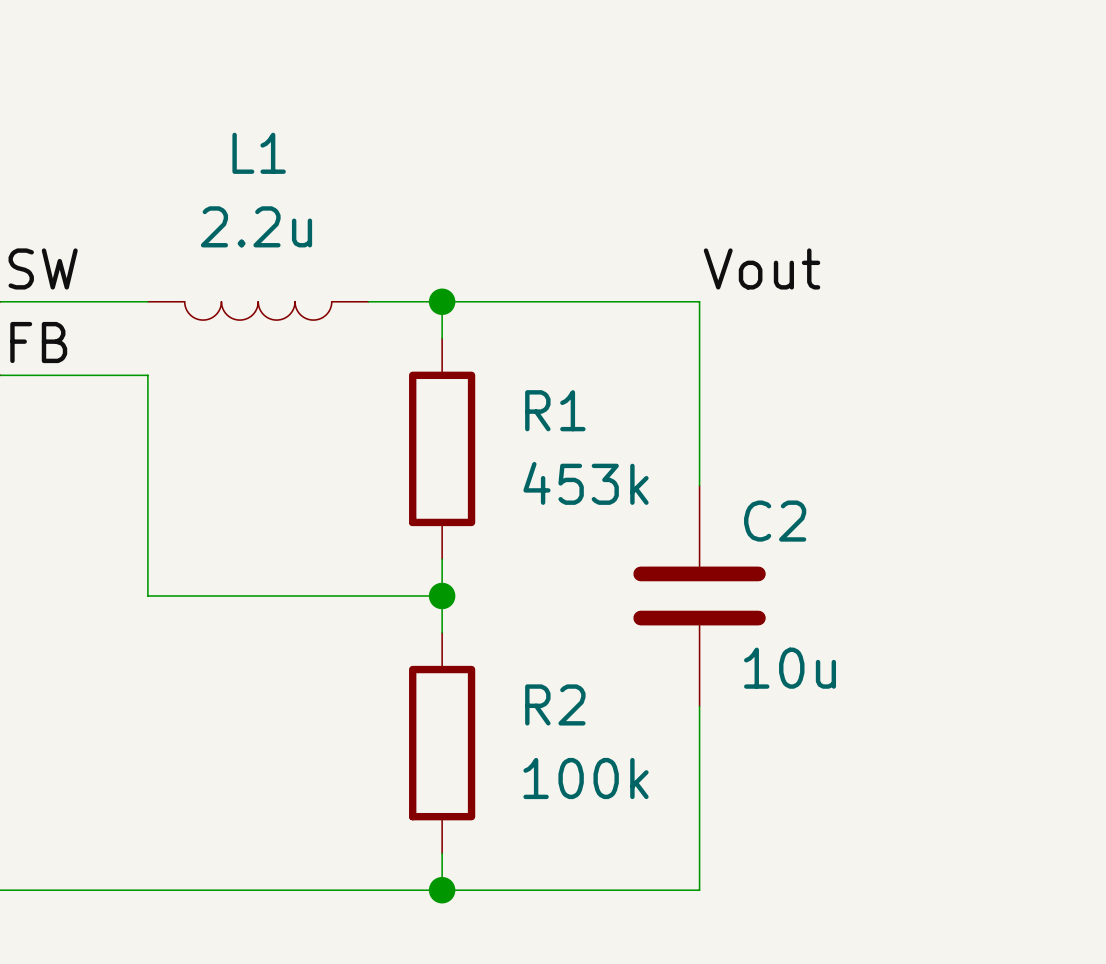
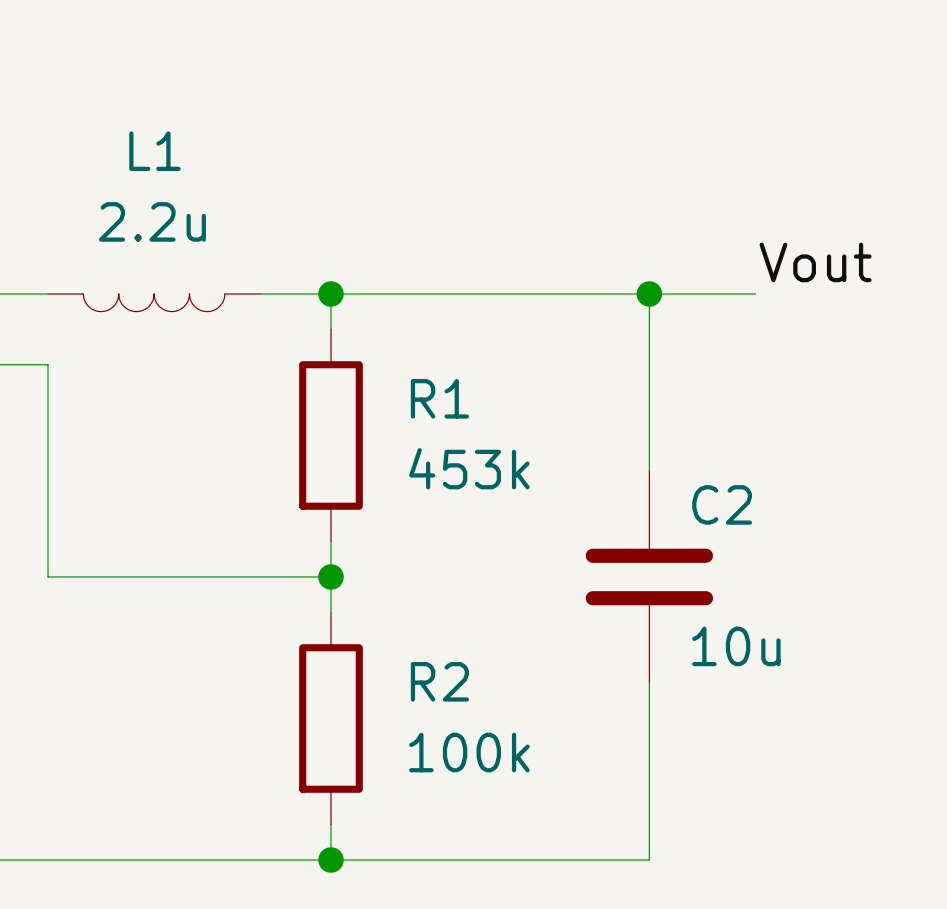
label position: Vout (762, 268) -> Vout (815, 262)
wire: (699, 301) (699, 485) -> (578, 293) (755, 293)
wire: none -> (649, 293) (649, 470)
junction: none -> (649, 293)
C2 position: (699, 595) -> (649, 576)
wire: (699, 706) (699, 890) -> (649, 683) (649, 860) (578, 860)

